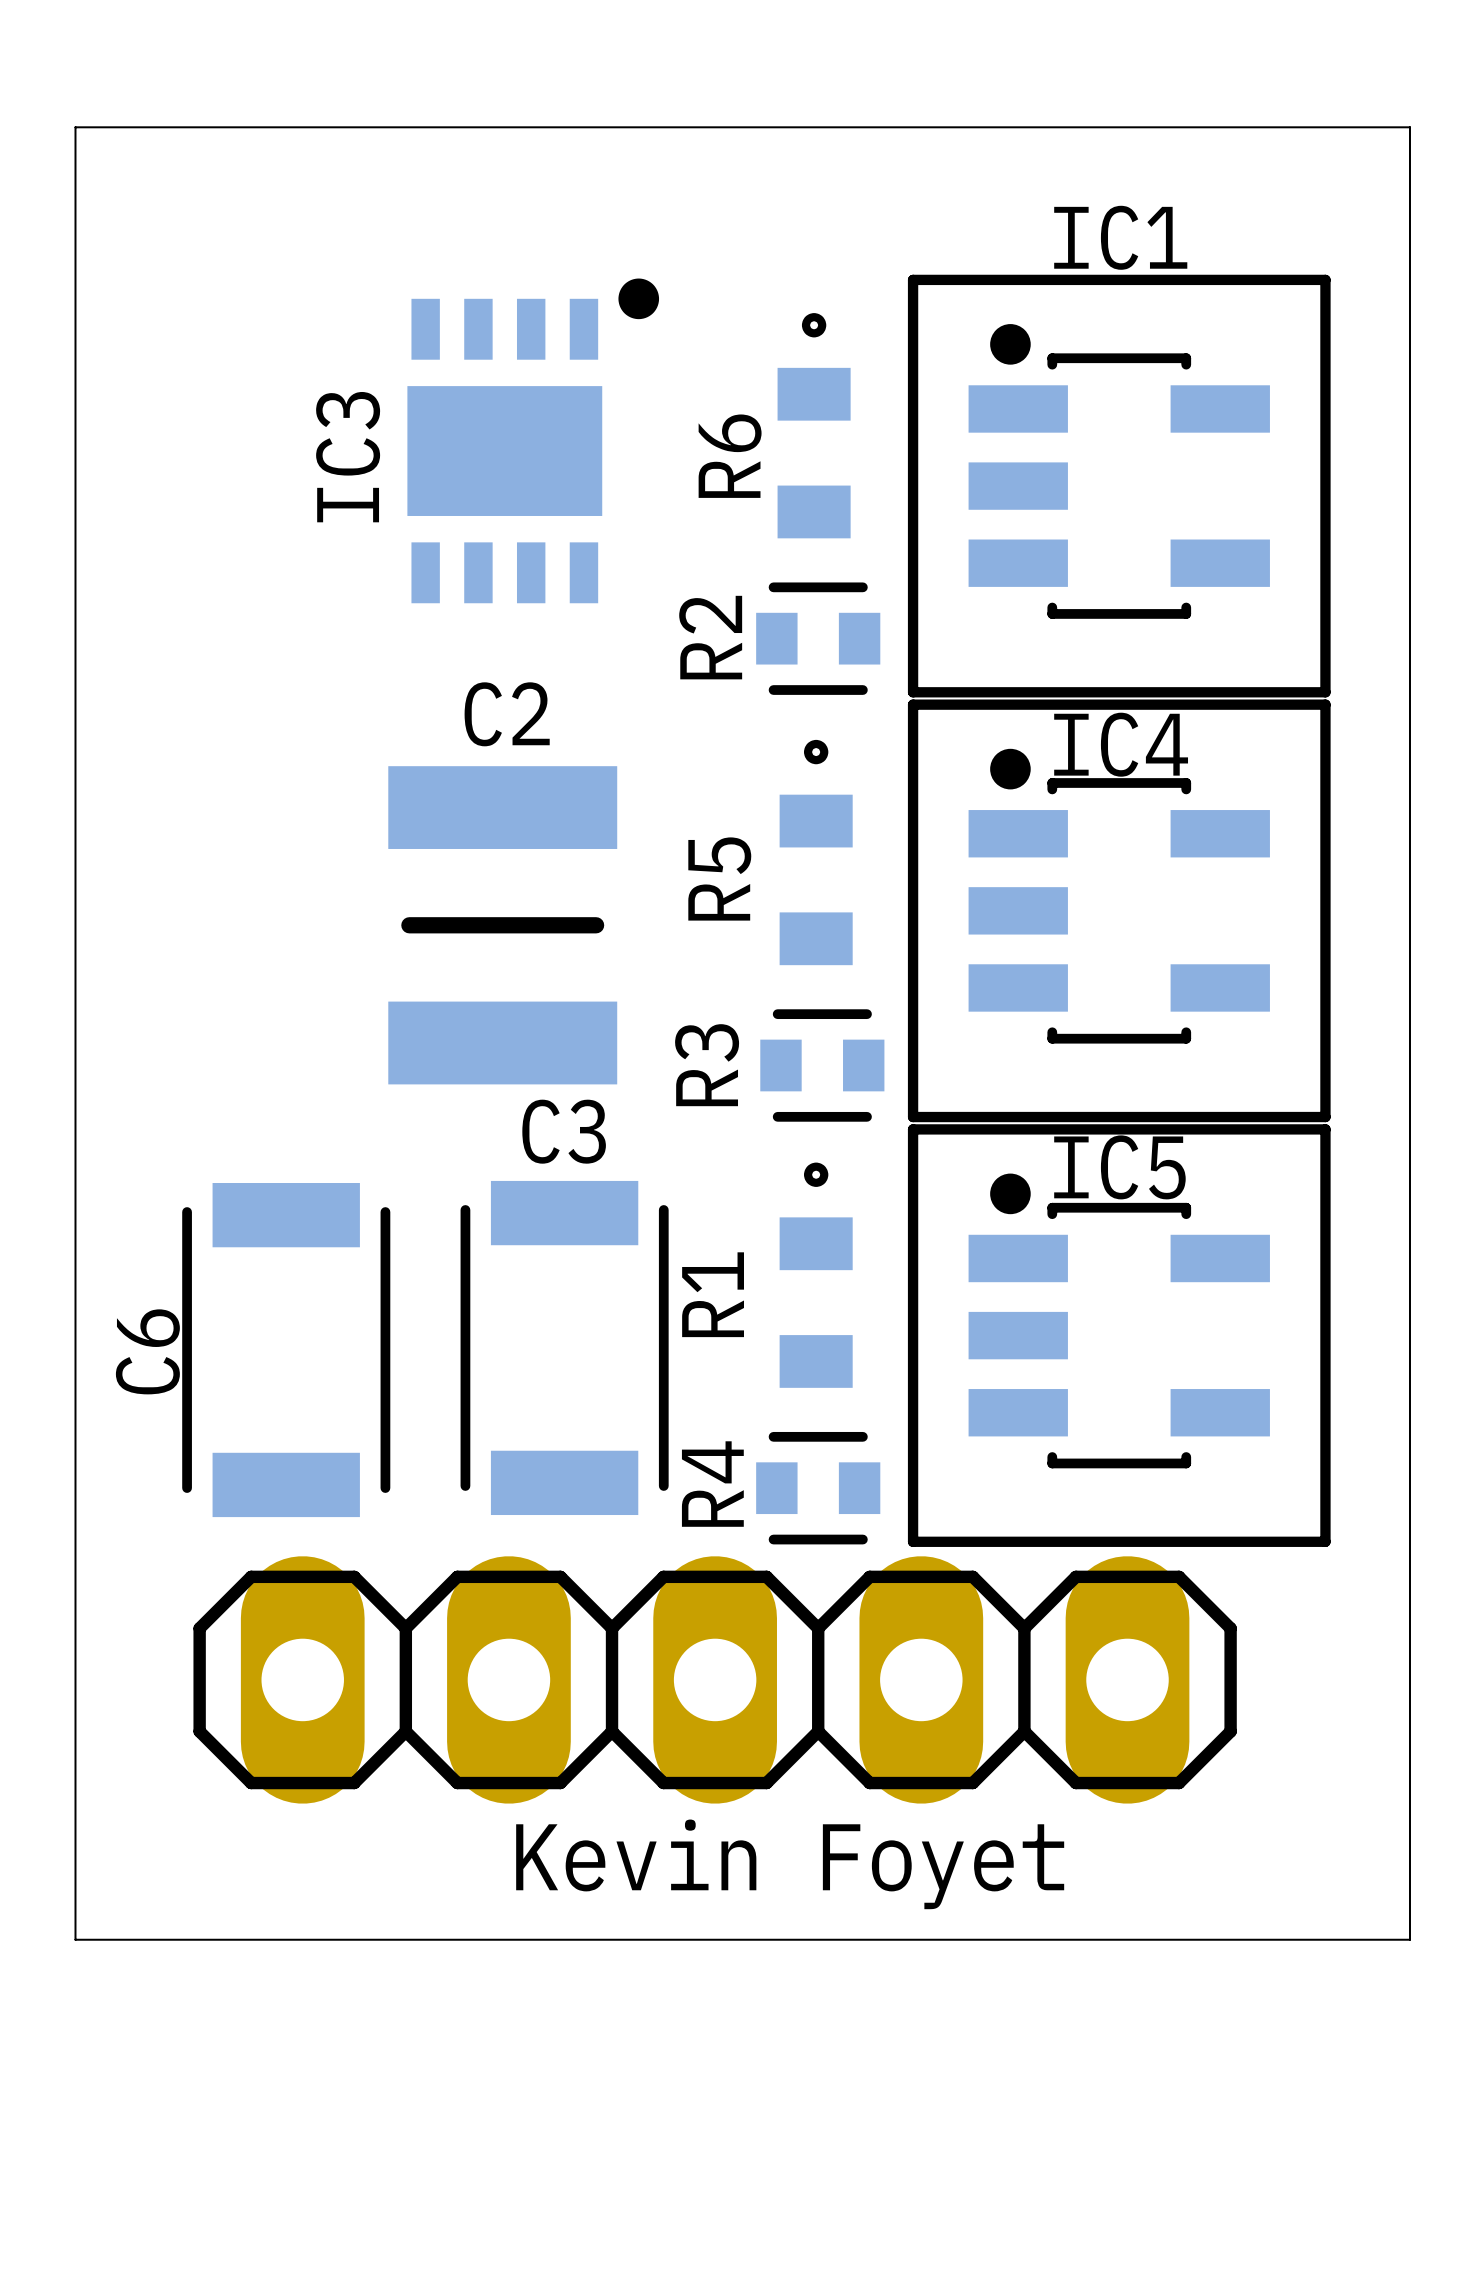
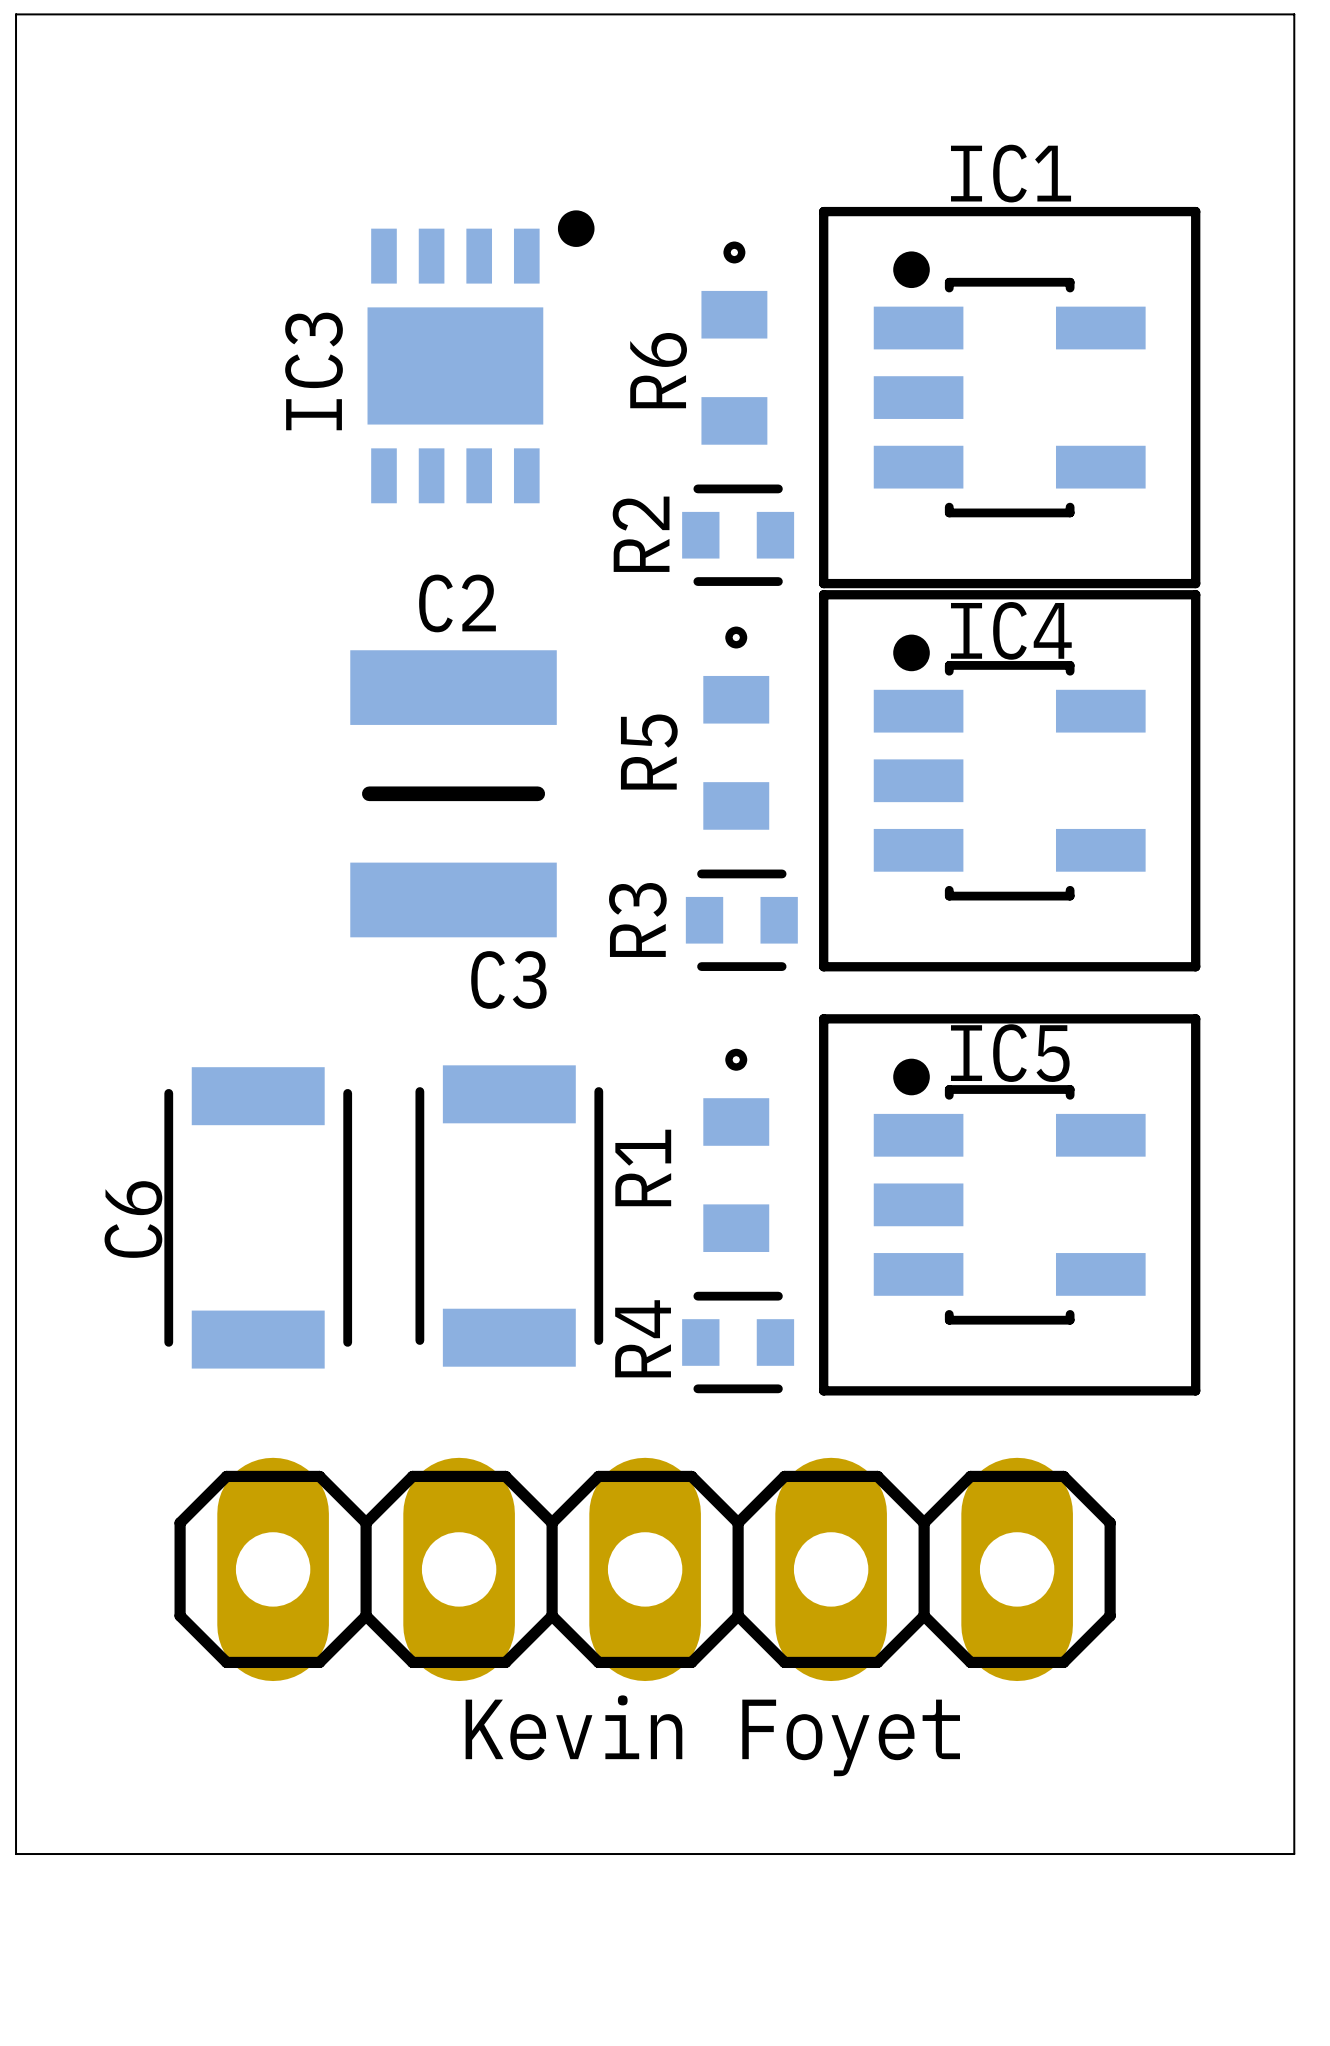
board edge: (1409, 127) (75, 127) (75, 1939) (1409, 1939) (1409, 127) -> (1294, 14) (1294, 1854) (16, 1854) (16, 14) (1294, 14)
R6 position: (814, 425) -> (734, 343)
IC3 position: (533, 440) -> (481, 356)
IC1 position: (1119, 486) -> (1009, 397)
R2 position: (818, 638) -> (738, 535)
R5 position: (816, 852) -> (736, 728)
IC4 position: (1119, 910) -> (1009, 780)
C2 position: (502, 925) -> (453, 793)
R3 position: (822, 1065) -> (741, 920)
C3 name position: C3 (564, 1131) -> C3 (508, 979)
part position: (715, 1679) -> (645, 1569)
text position: Kevin Foyet (790, 1864) -> Kevin Foyet (712, 1735)

